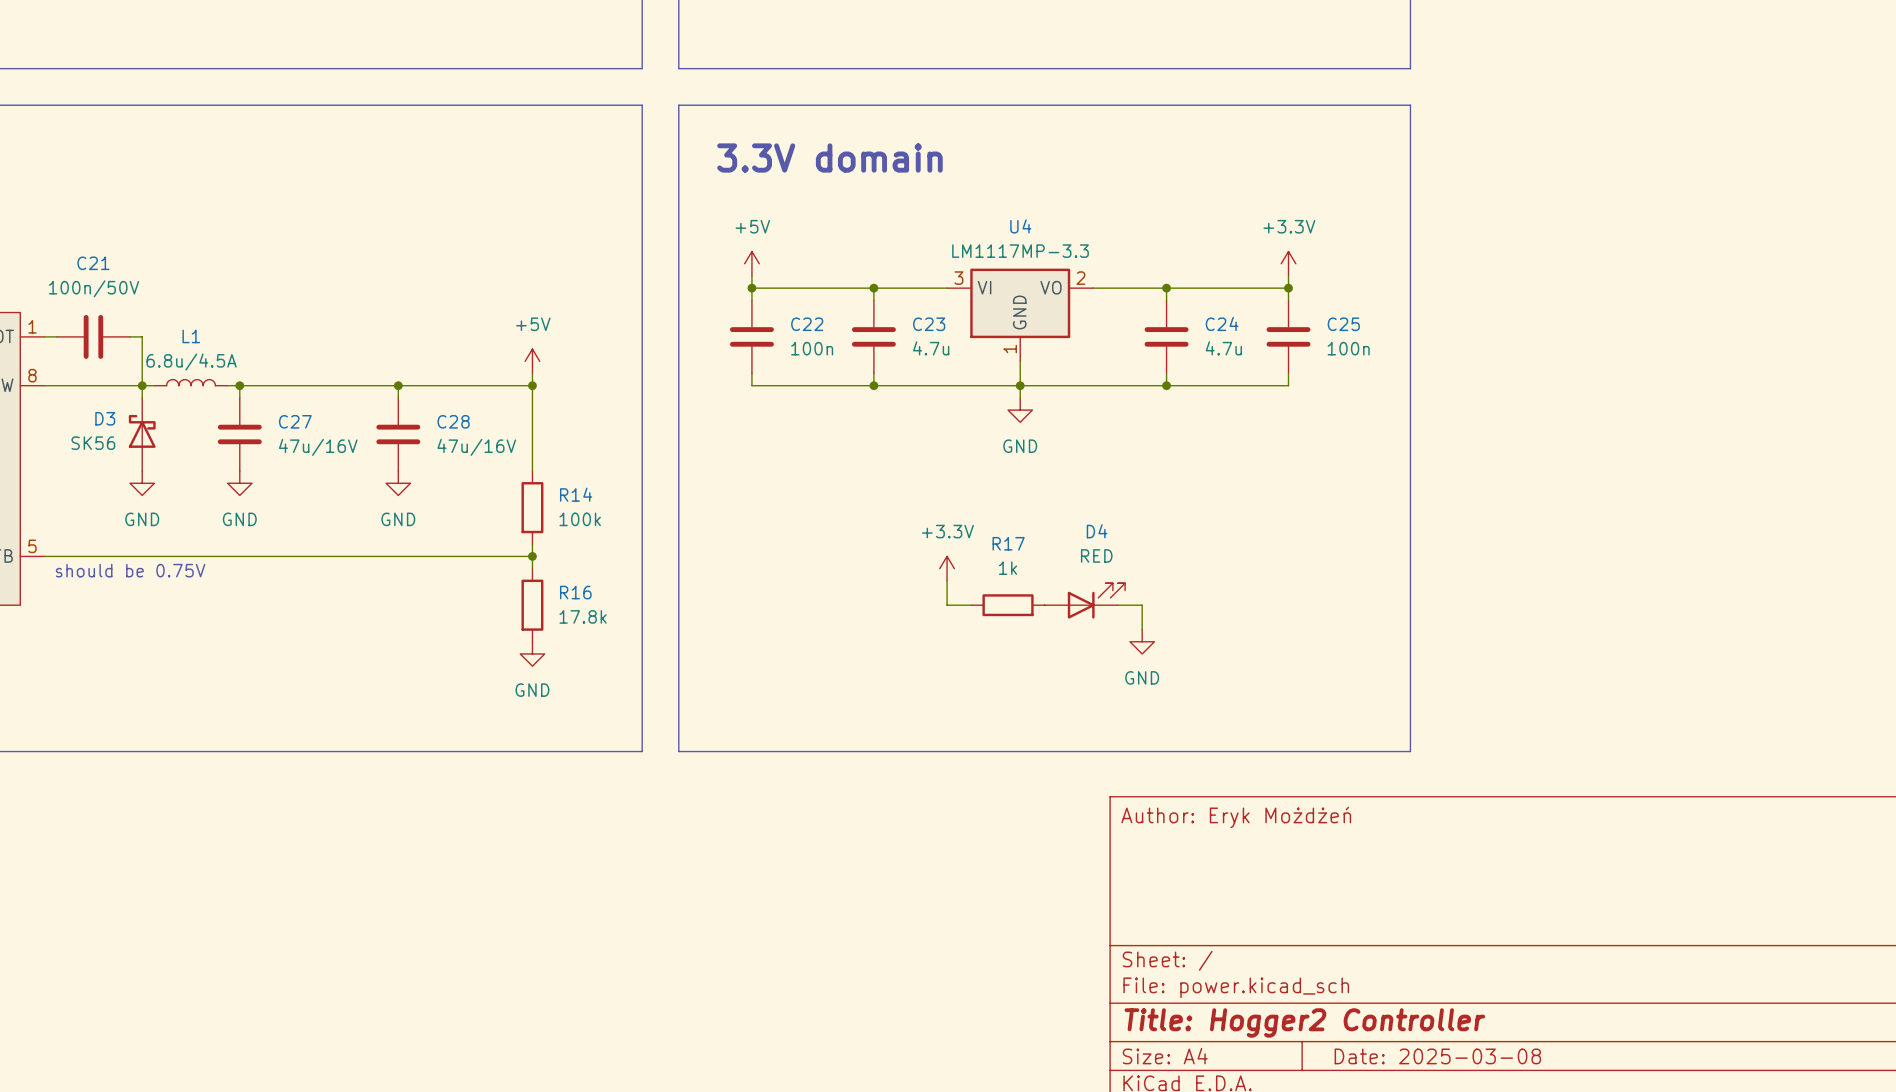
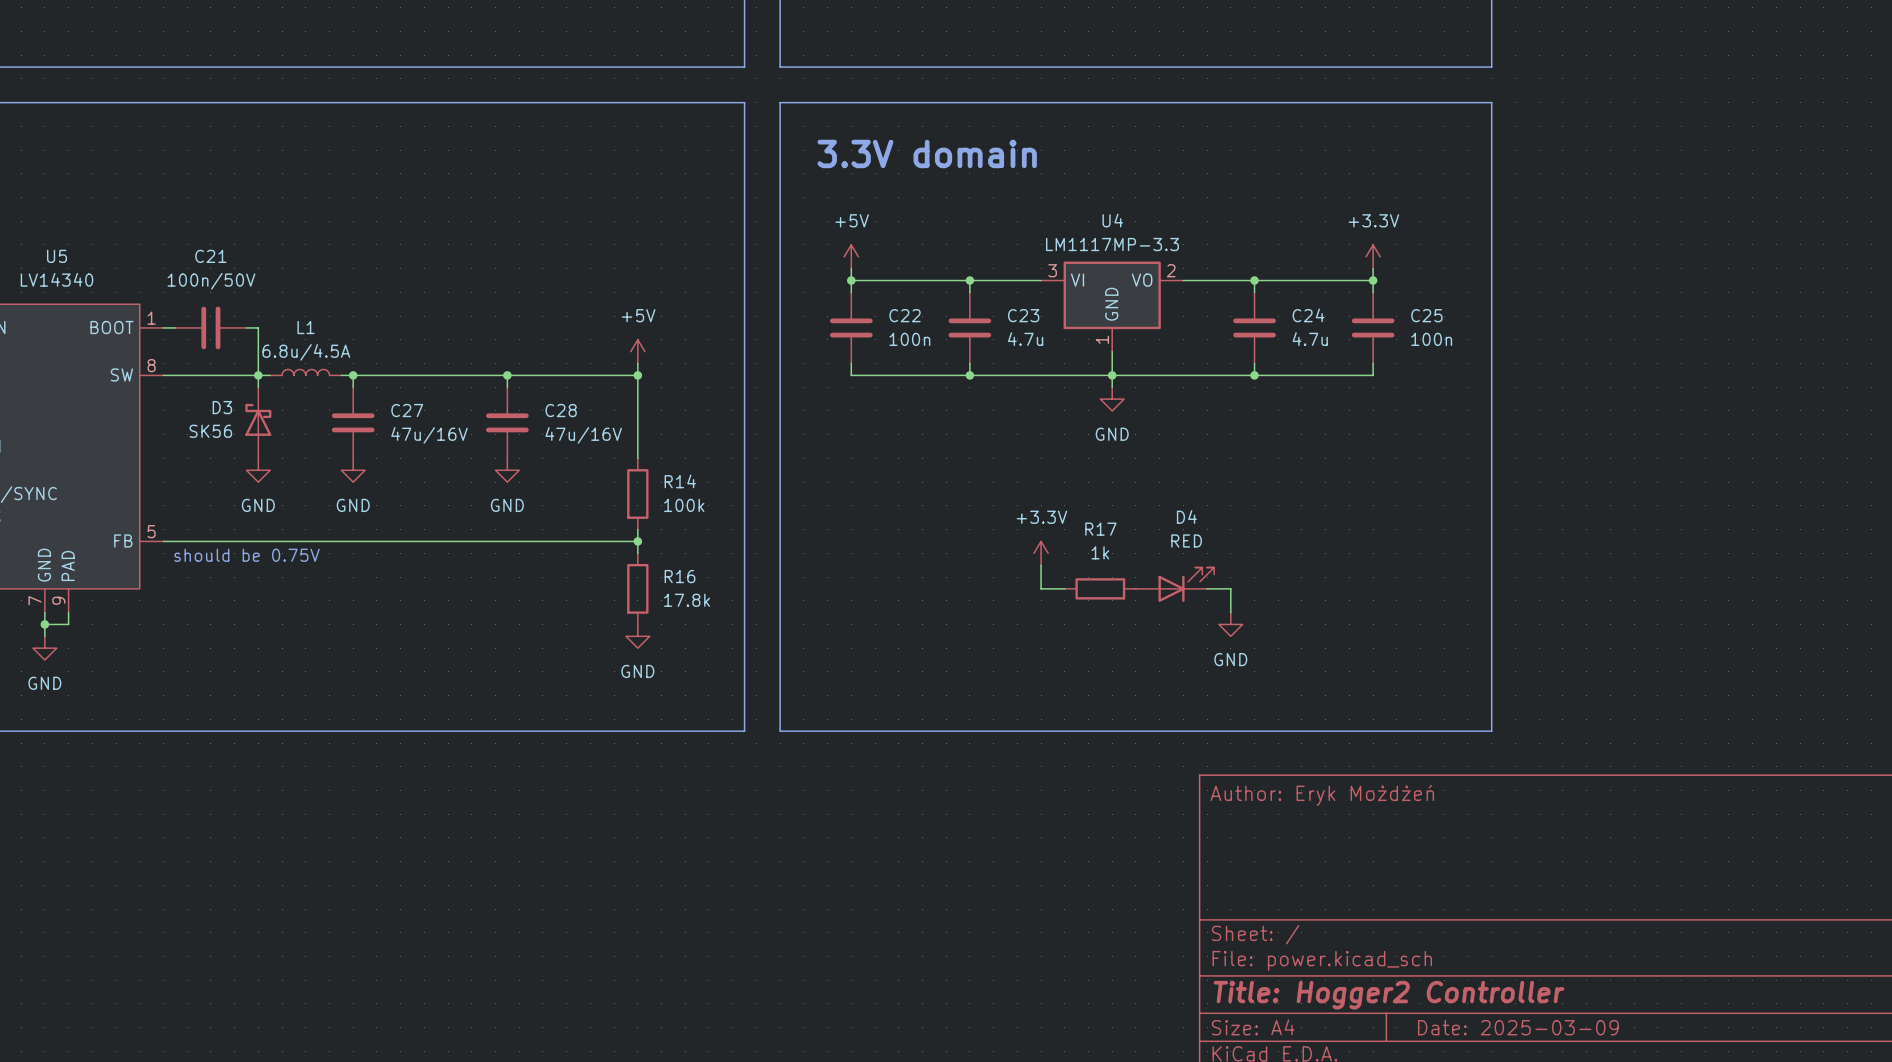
title block: Date: 2025-03-08 (1437, 1056) -> Date: 2025-03-09 (1518, 1027)

